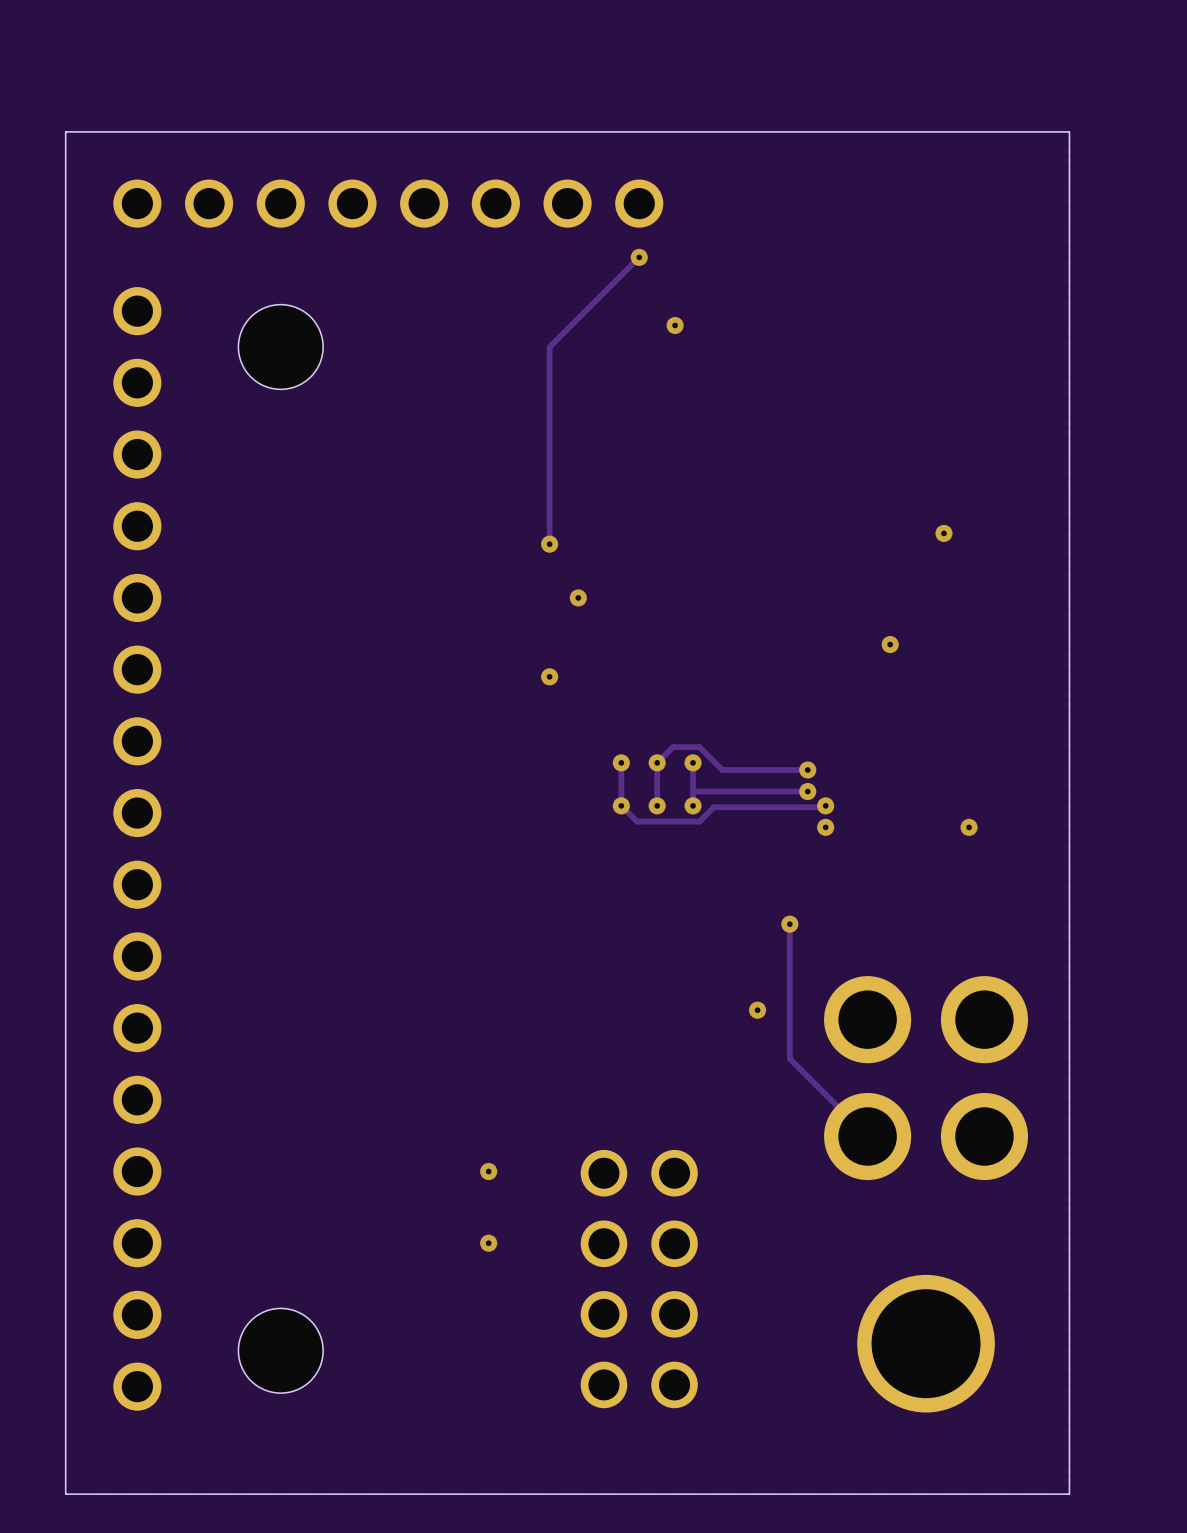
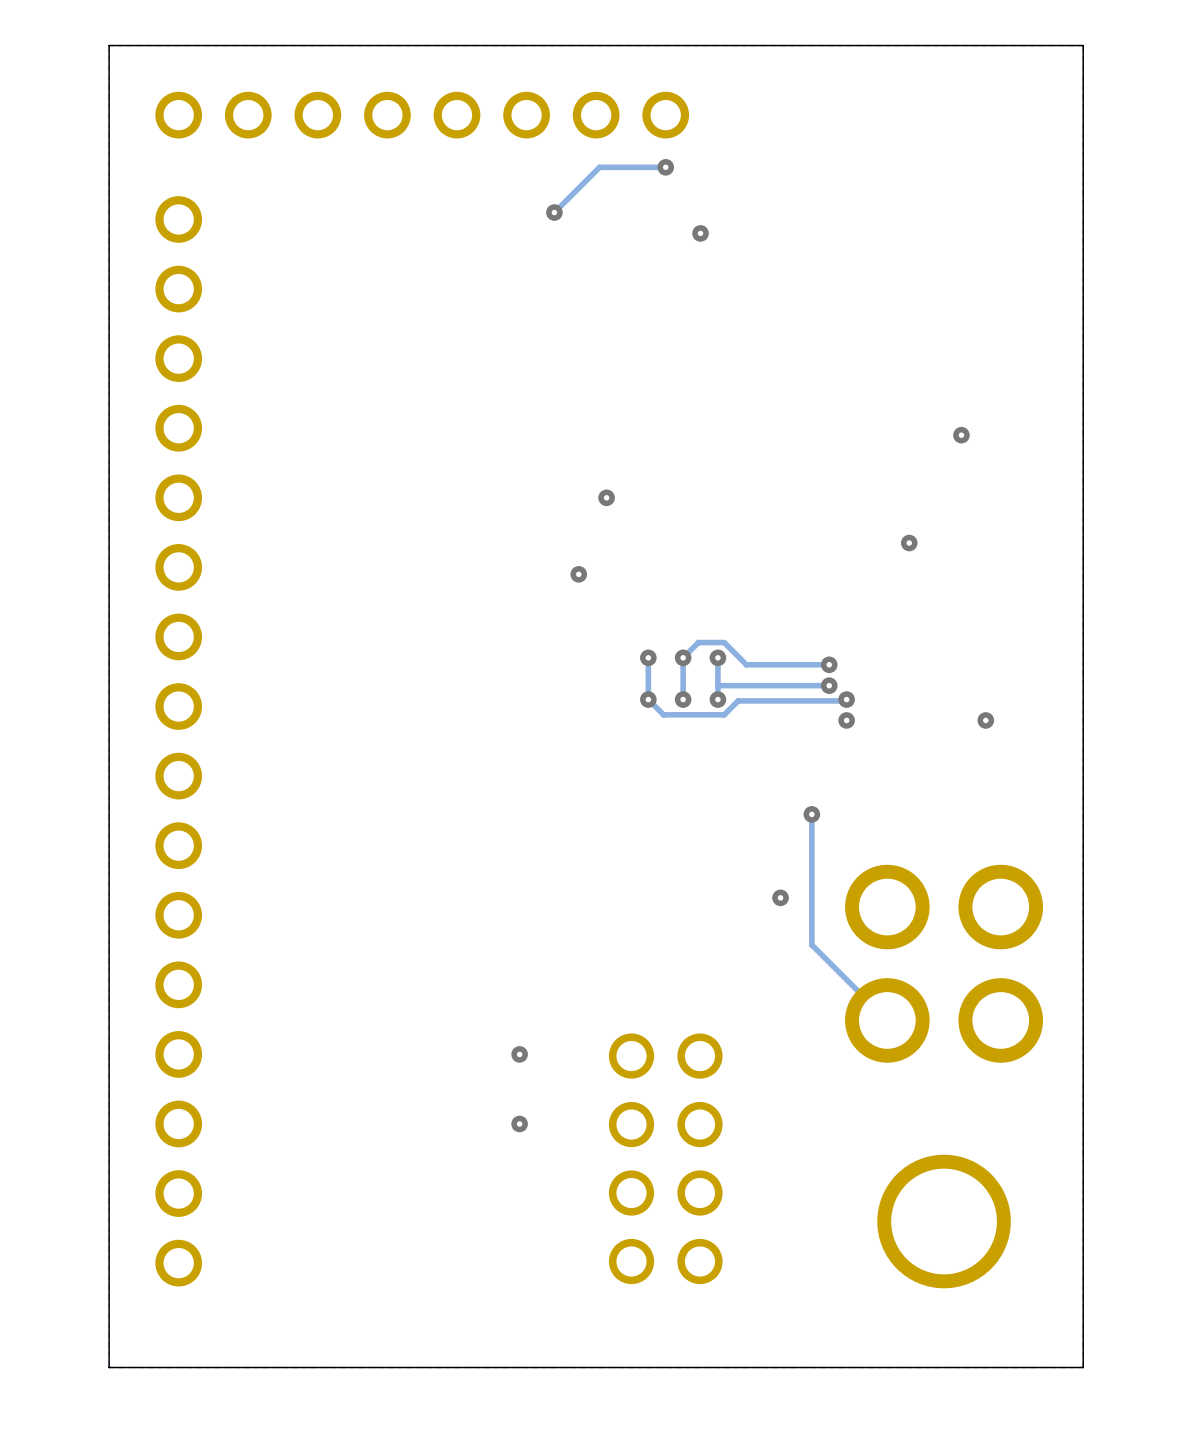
track: (639, 257) (549, 347) (549, 544) -> (665, 167) (599, 167) (554, 212)
via: none -> (554, 212)
hole: (280, 347) -> none
via: (549, 544) -> none
hole: (280, 1350) -> none

